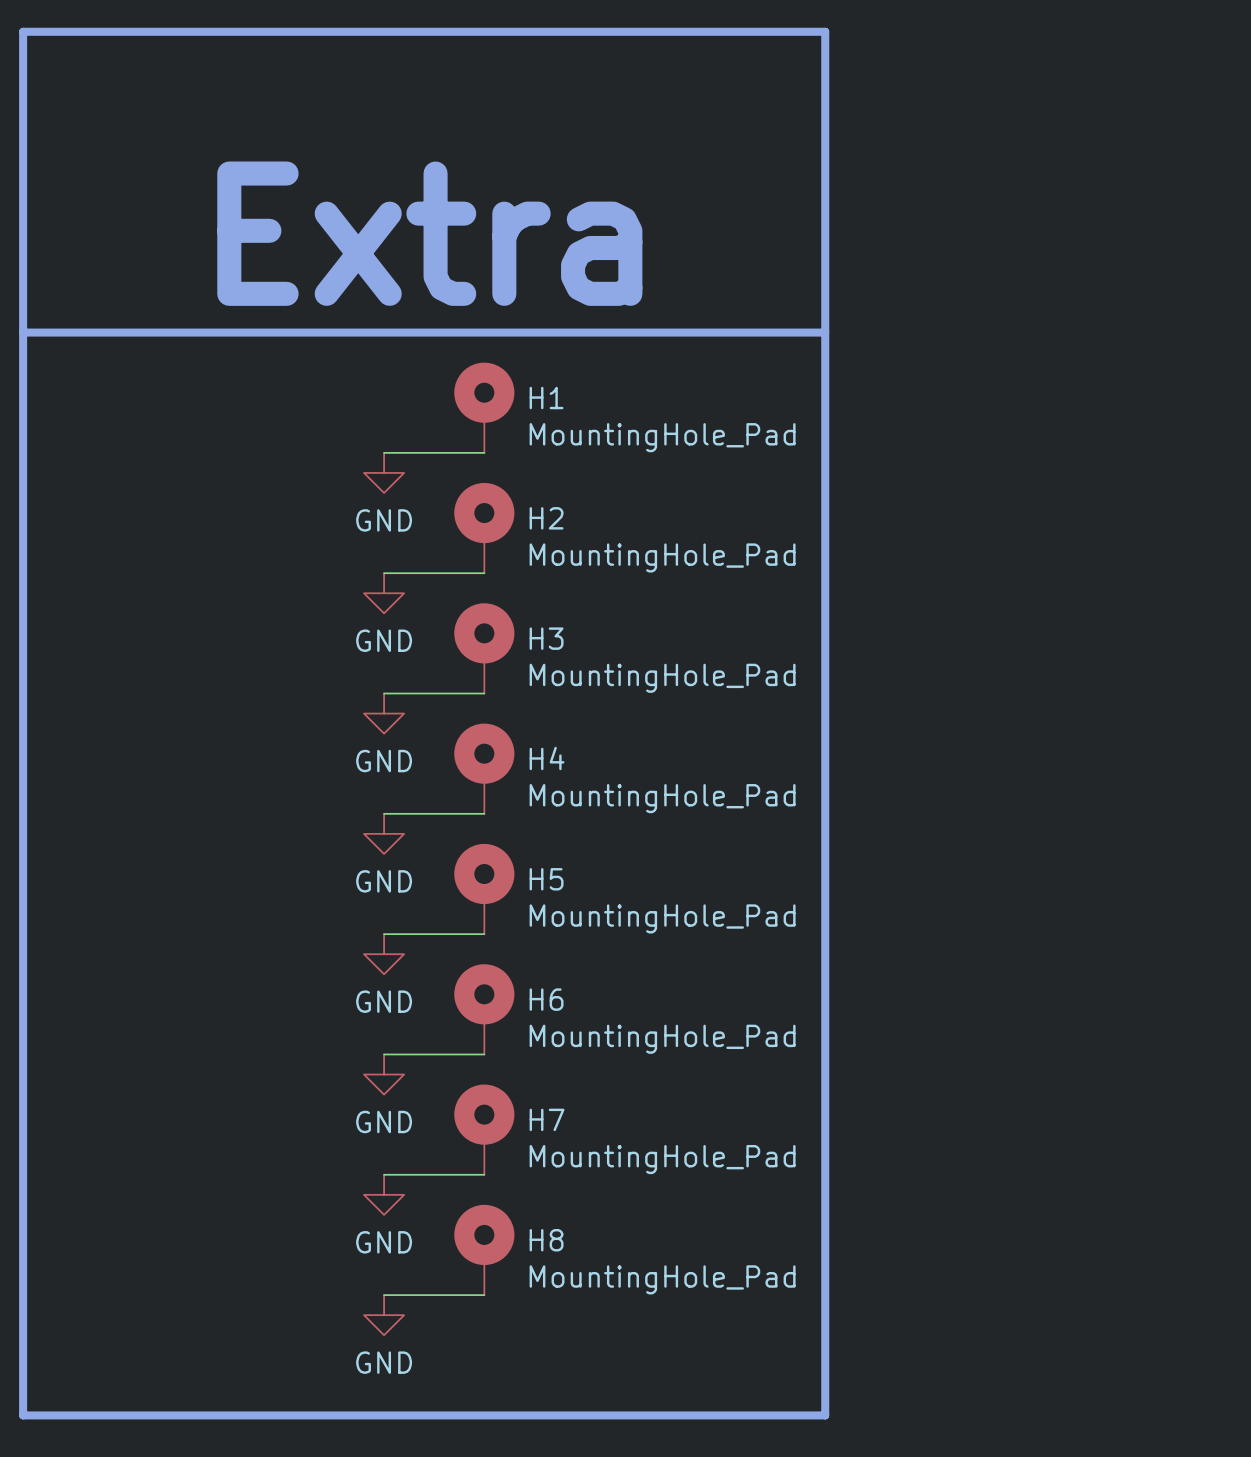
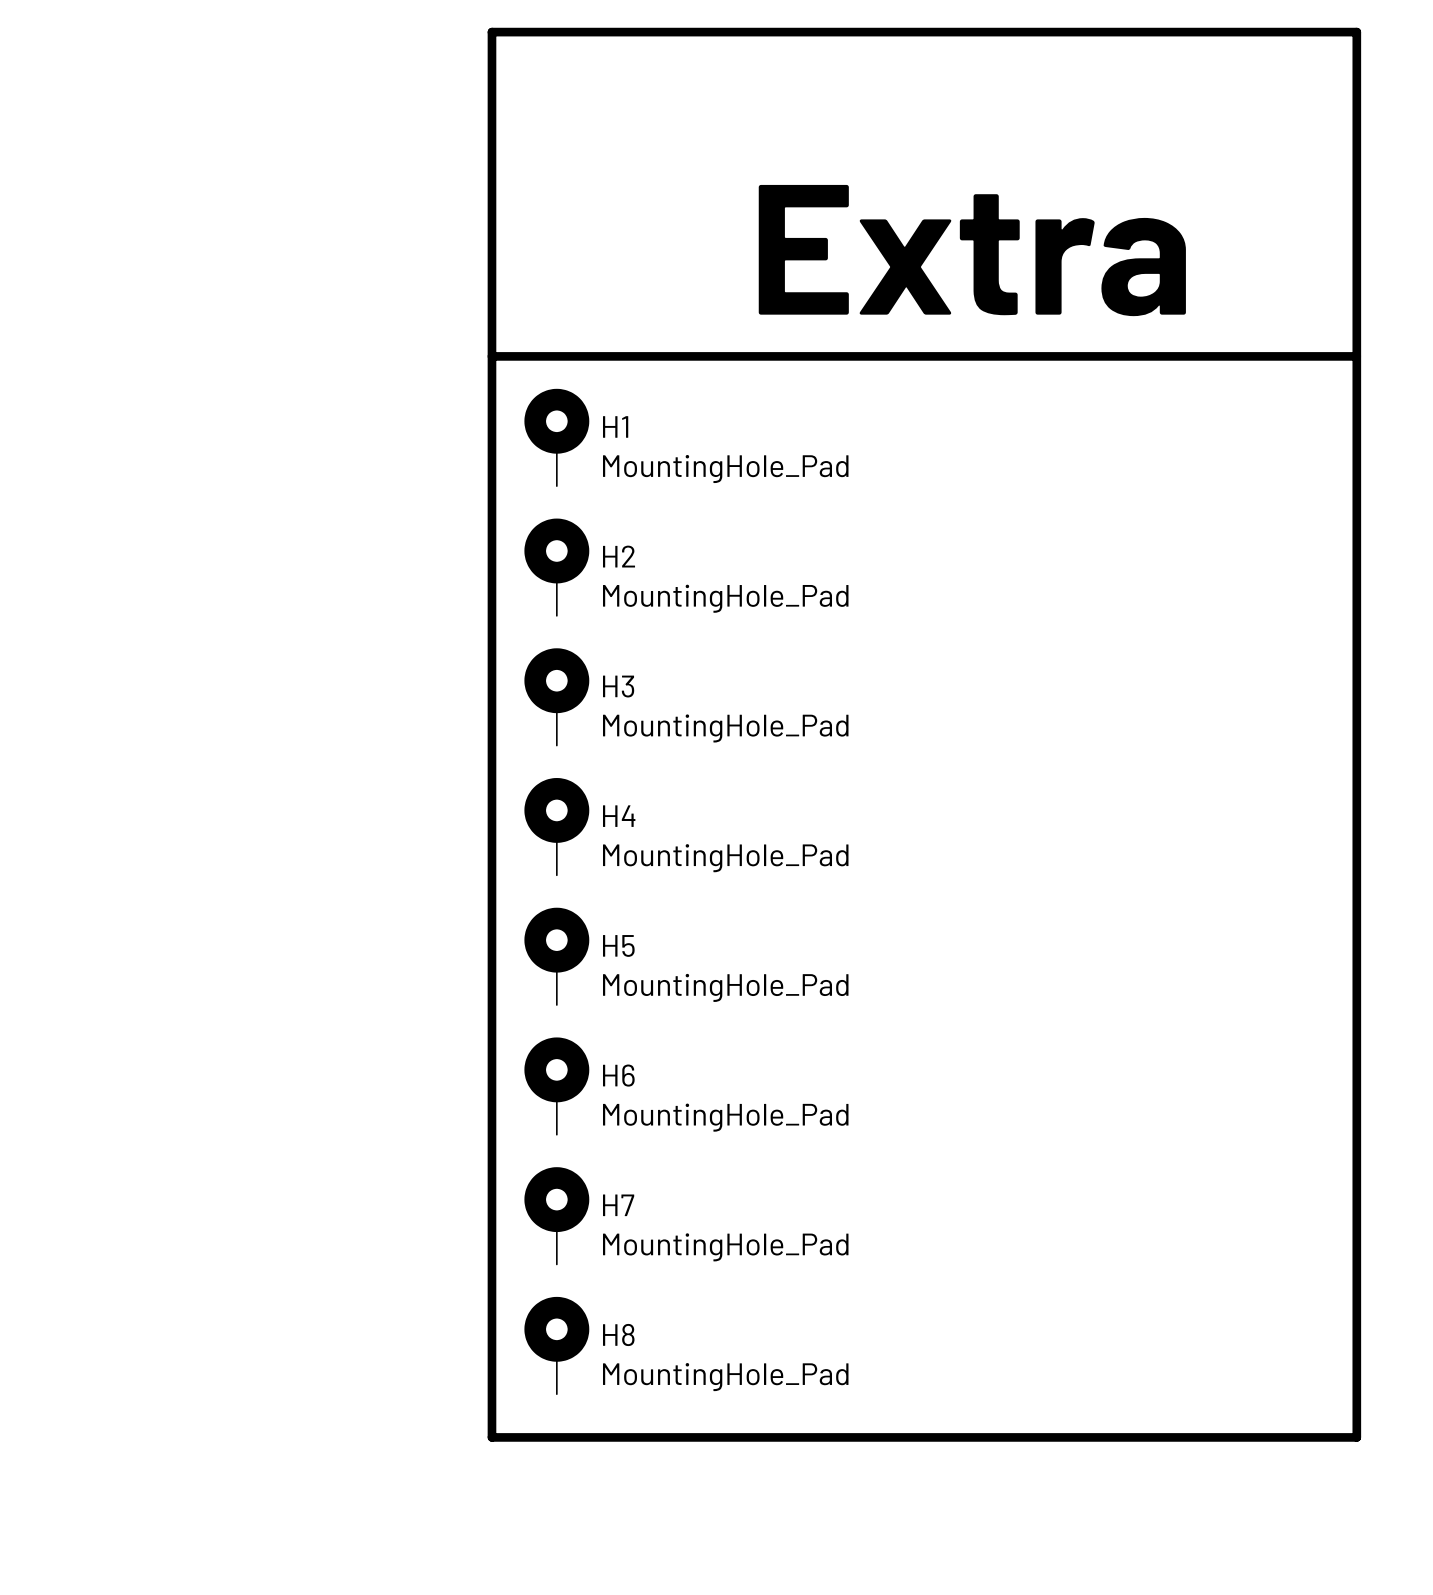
line: (424, 31) (23, 31) (23, 1415) (825, 1415) (825, 31) -> (491, 32) (491, 1437) (1356, 1437) (1356, 32) (924, 32)
text: Extra (429, 233) -> none
text: none -> Extra (972, 250)
line: (23, 332) (424, 332) -> none
line: none -> (924, 356) (1356, 356)
wire: (384, 452) (484, 452) -> none
power symbol: GND (384, 472) -> none
wire: (384, 573) (484, 573) -> none
power symbol: GND (384, 593) -> none
wire: (384, 693) (484, 693) -> none
power symbol: GND (384, 713) -> none
wire: (384, 813) (484, 813) -> none
power symbol: GND (384, 833) -> none
wire: (384, 934) (484, 934) -> none
power symbol: GND (384, 954) -> none
wire: (384, 1054) (484, 1054) -> none
power symbol: GND (384, 1074) -> none
wire: (384, 1174) (484, 1174) -> none
power symbol: GND (384, 1194) -> none
wire: (384, 1295) (484, 1295) -> none
power symbol: GND (384, 1315) -> none

